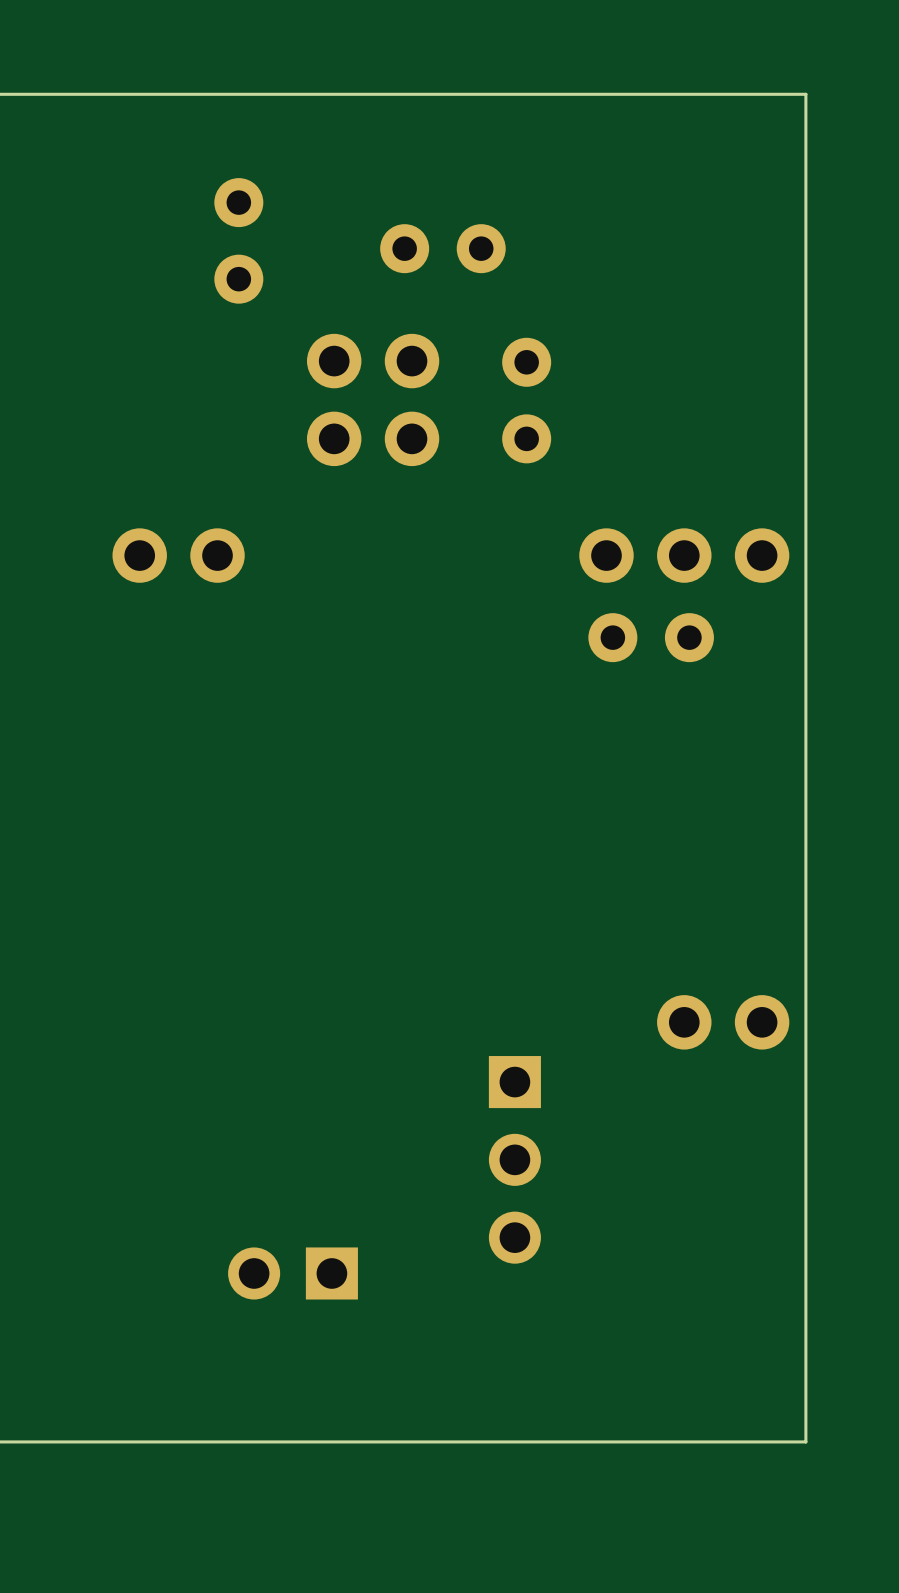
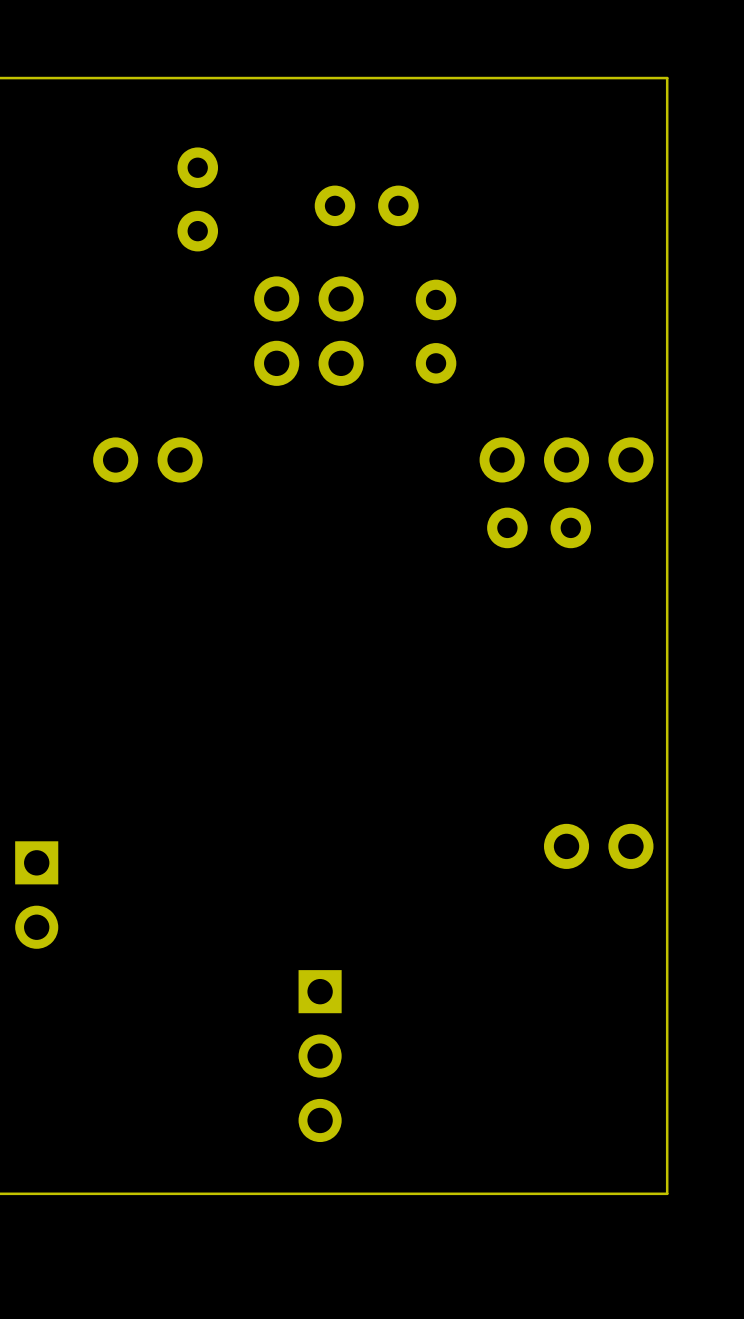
part position: (514, 1159) -> (320, 1056)
part rotation: 0° (293, 1273) -> 90° counterclockwise (36, 895)
part position: (293, 1273) -> (36, 895)

